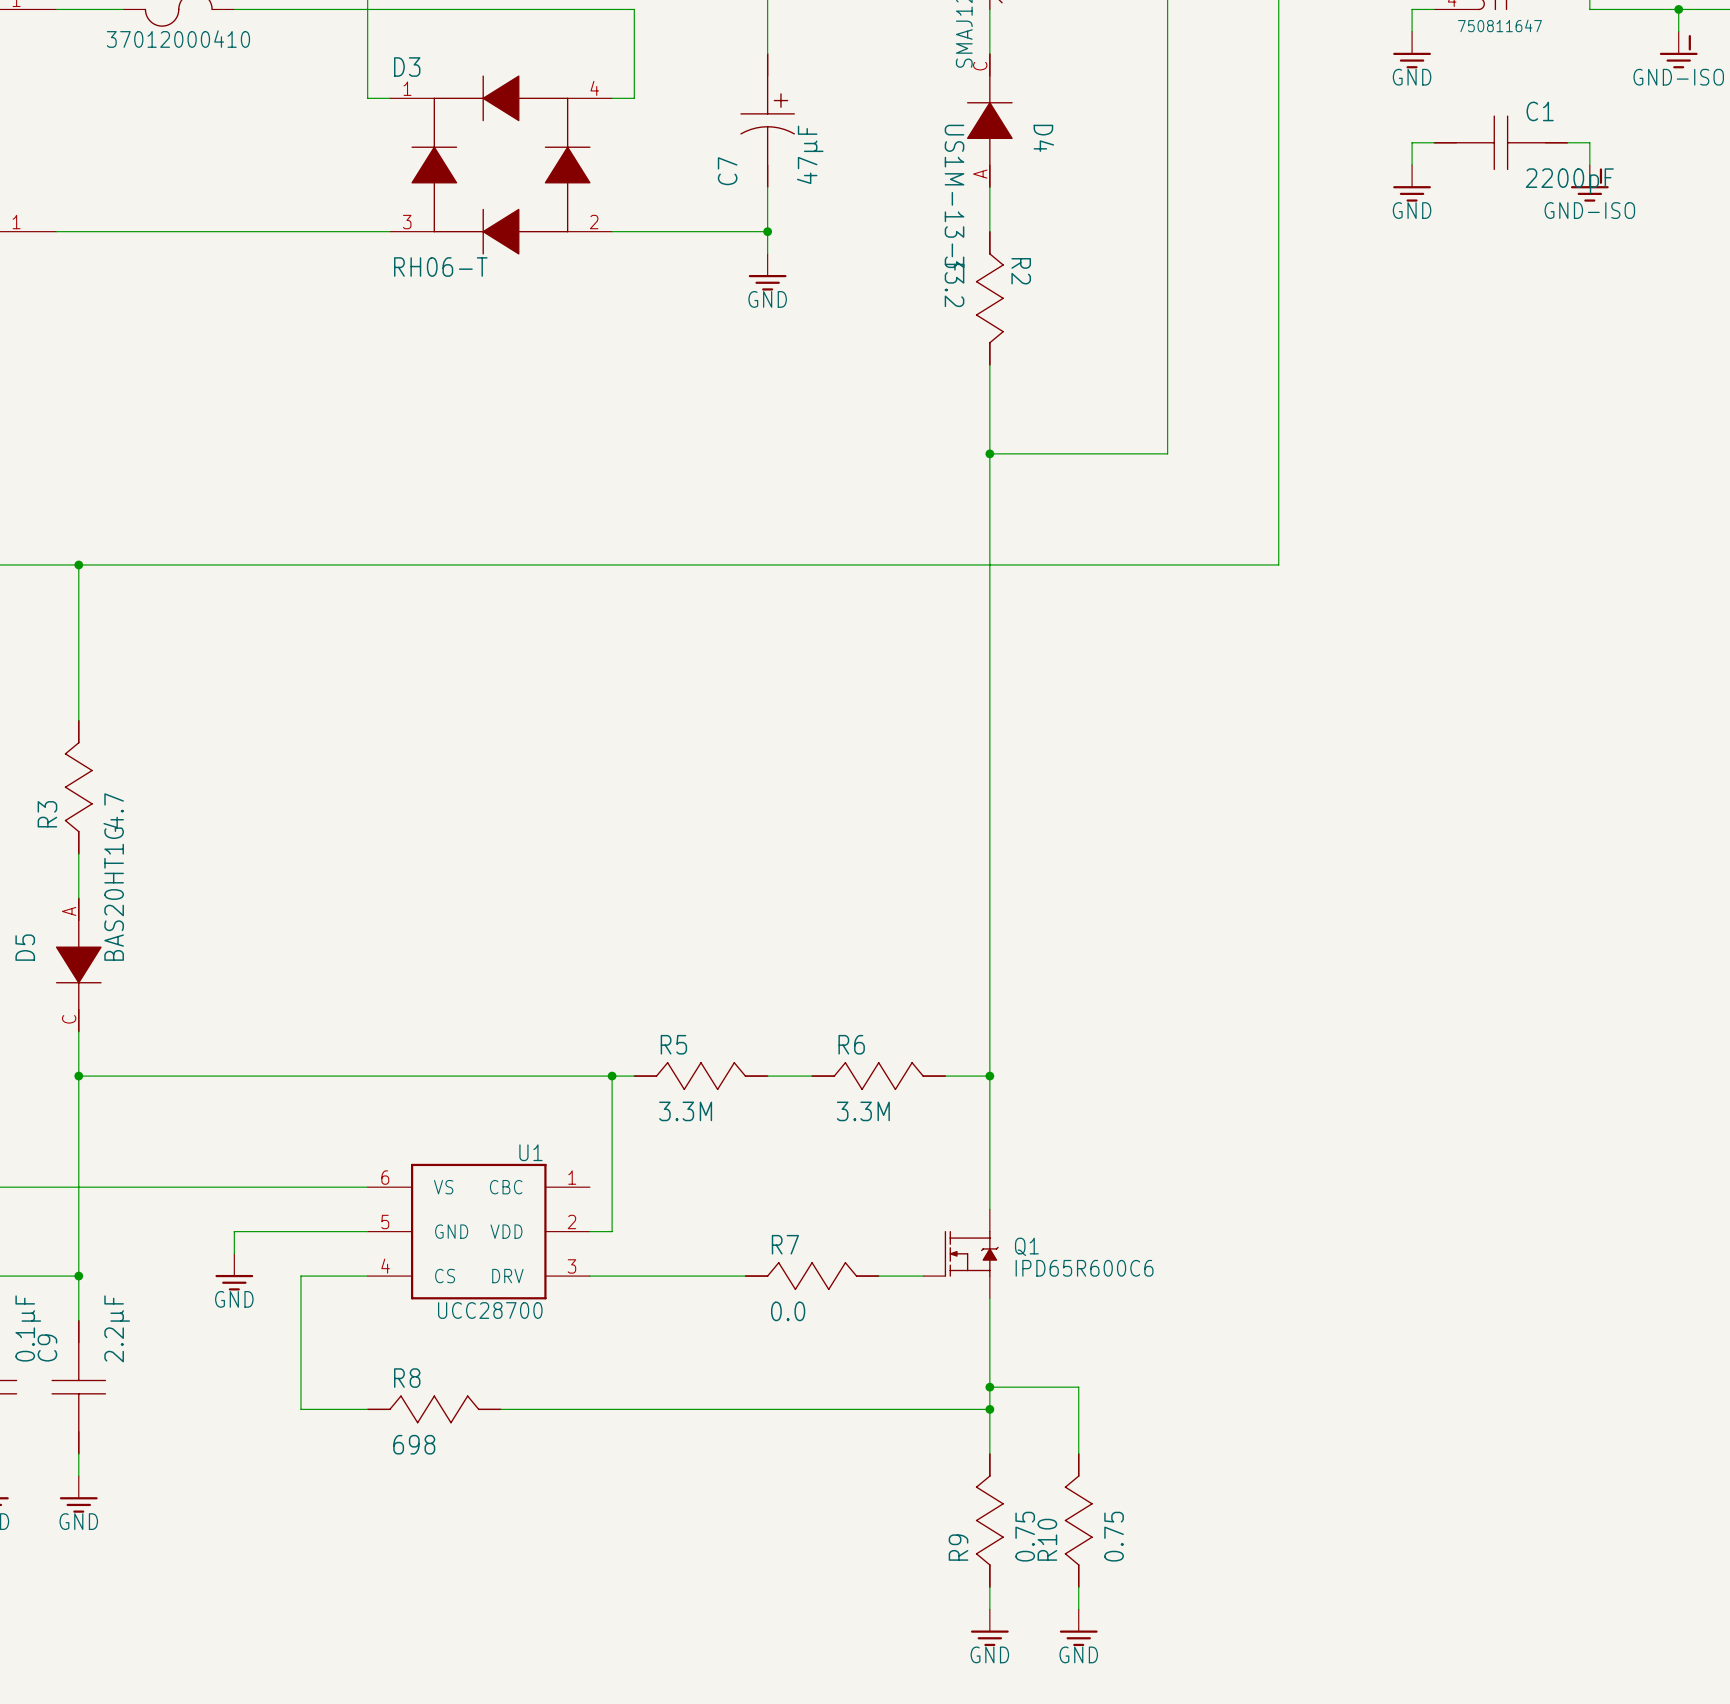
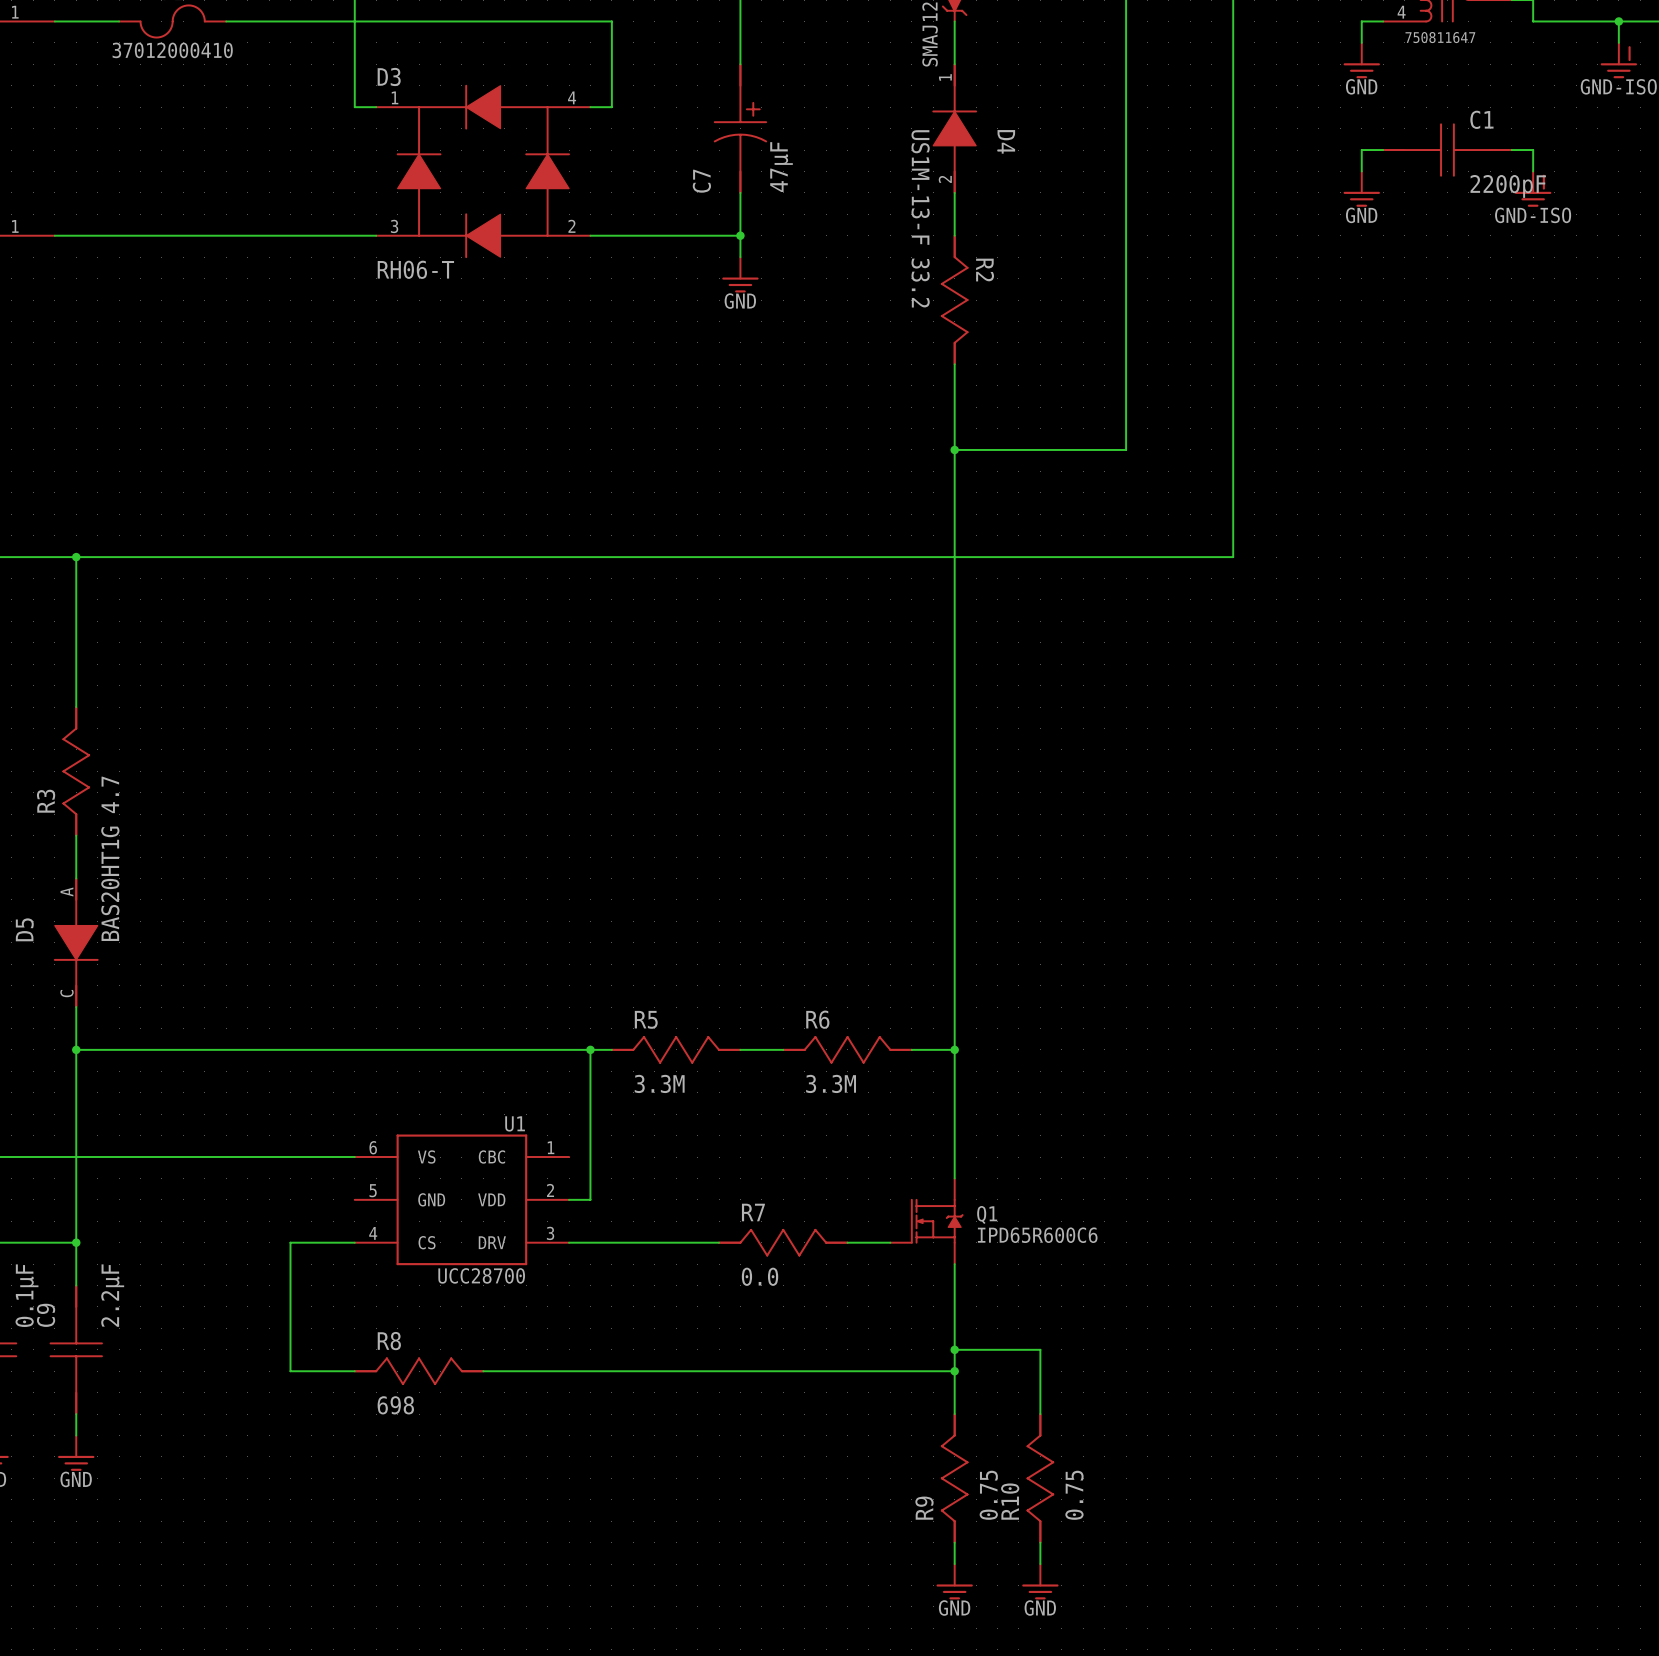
D4 pin number: C (980, 66) -> 1 (945, 77)
D4 pin number: A (980, 174) -> 2 (945, 179)
wire: (367, 1231) (234, 1231) (234, 1253) -> none
power symbol: GND (234, 1272) -> none

